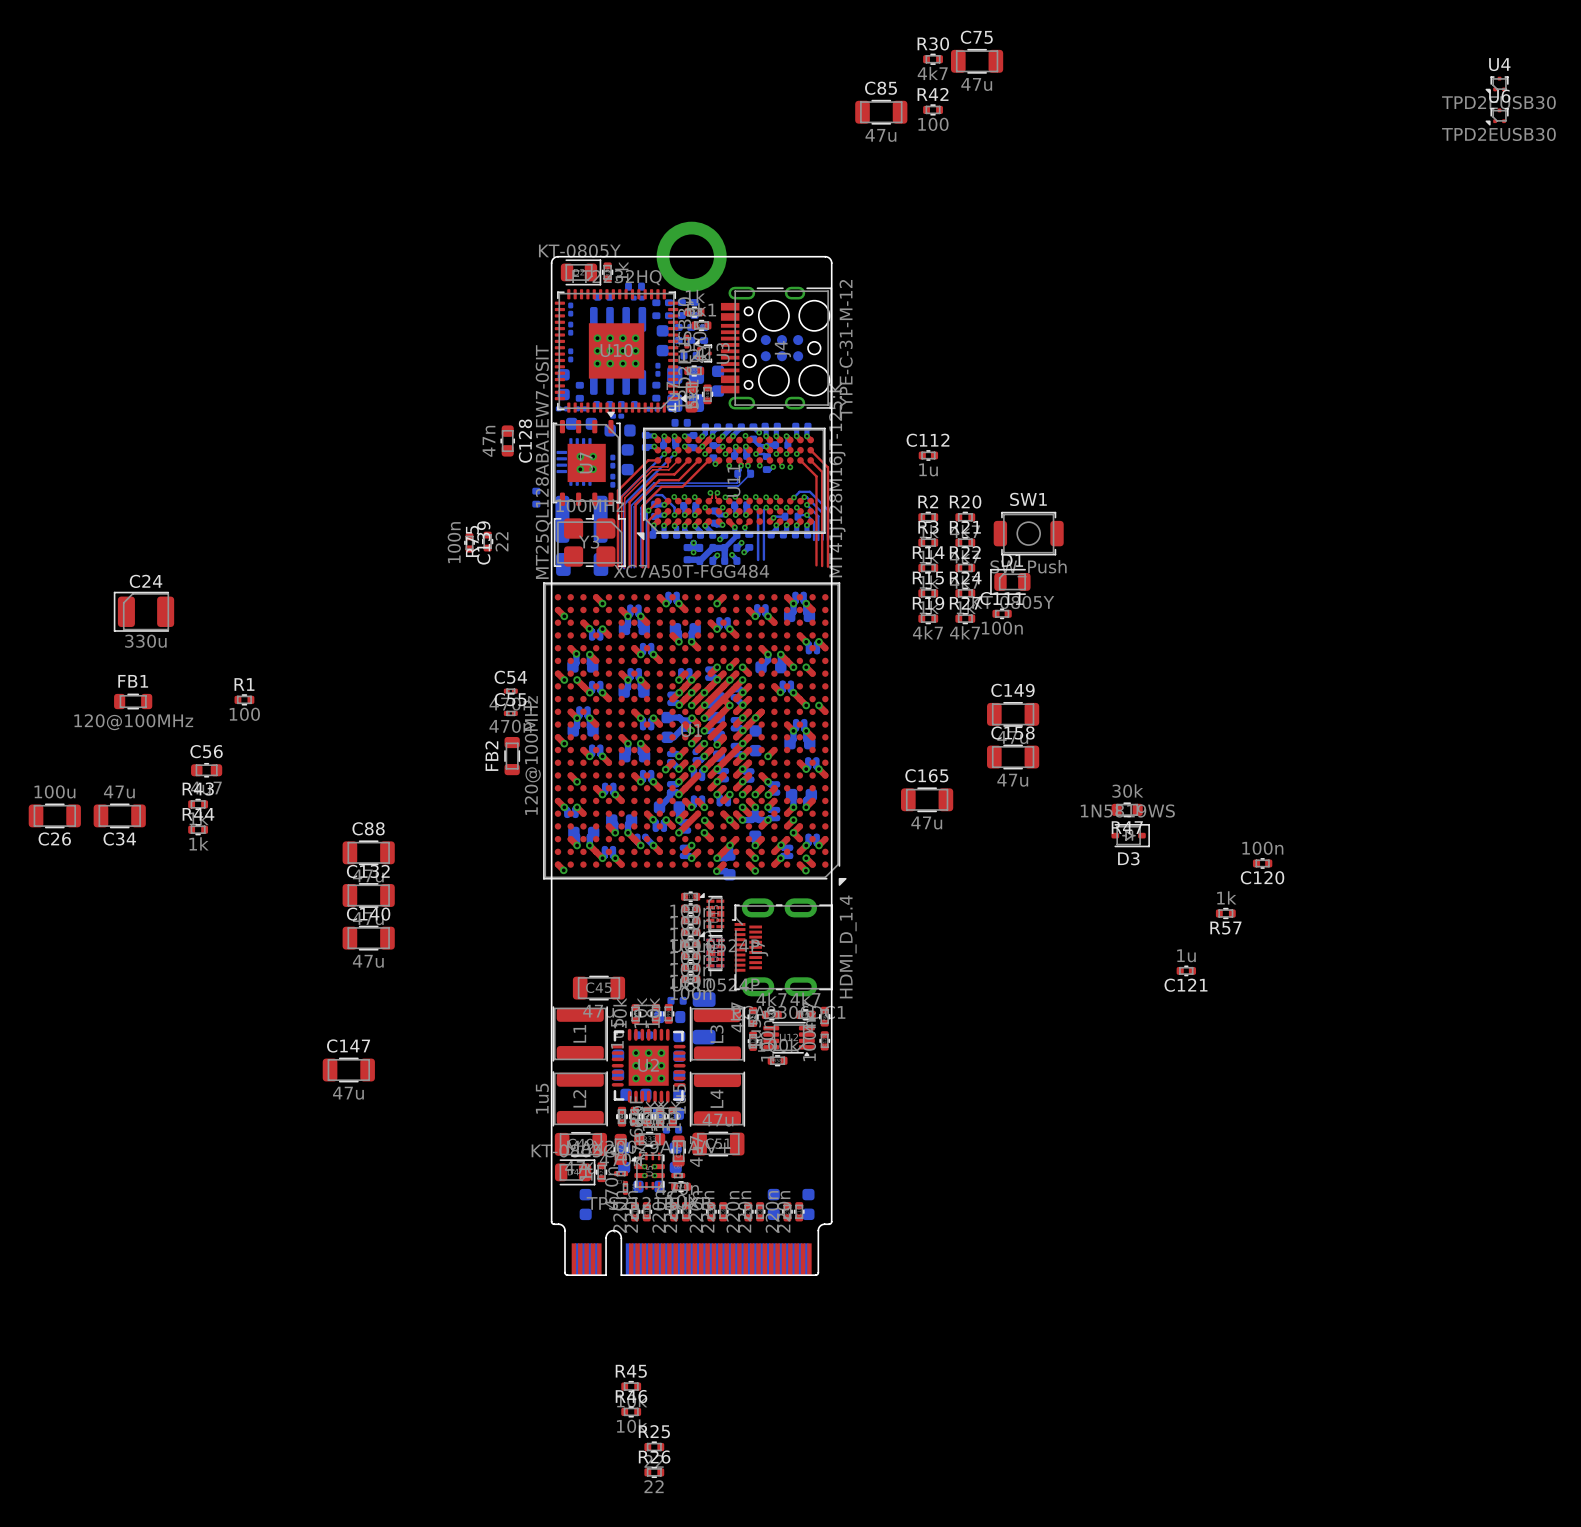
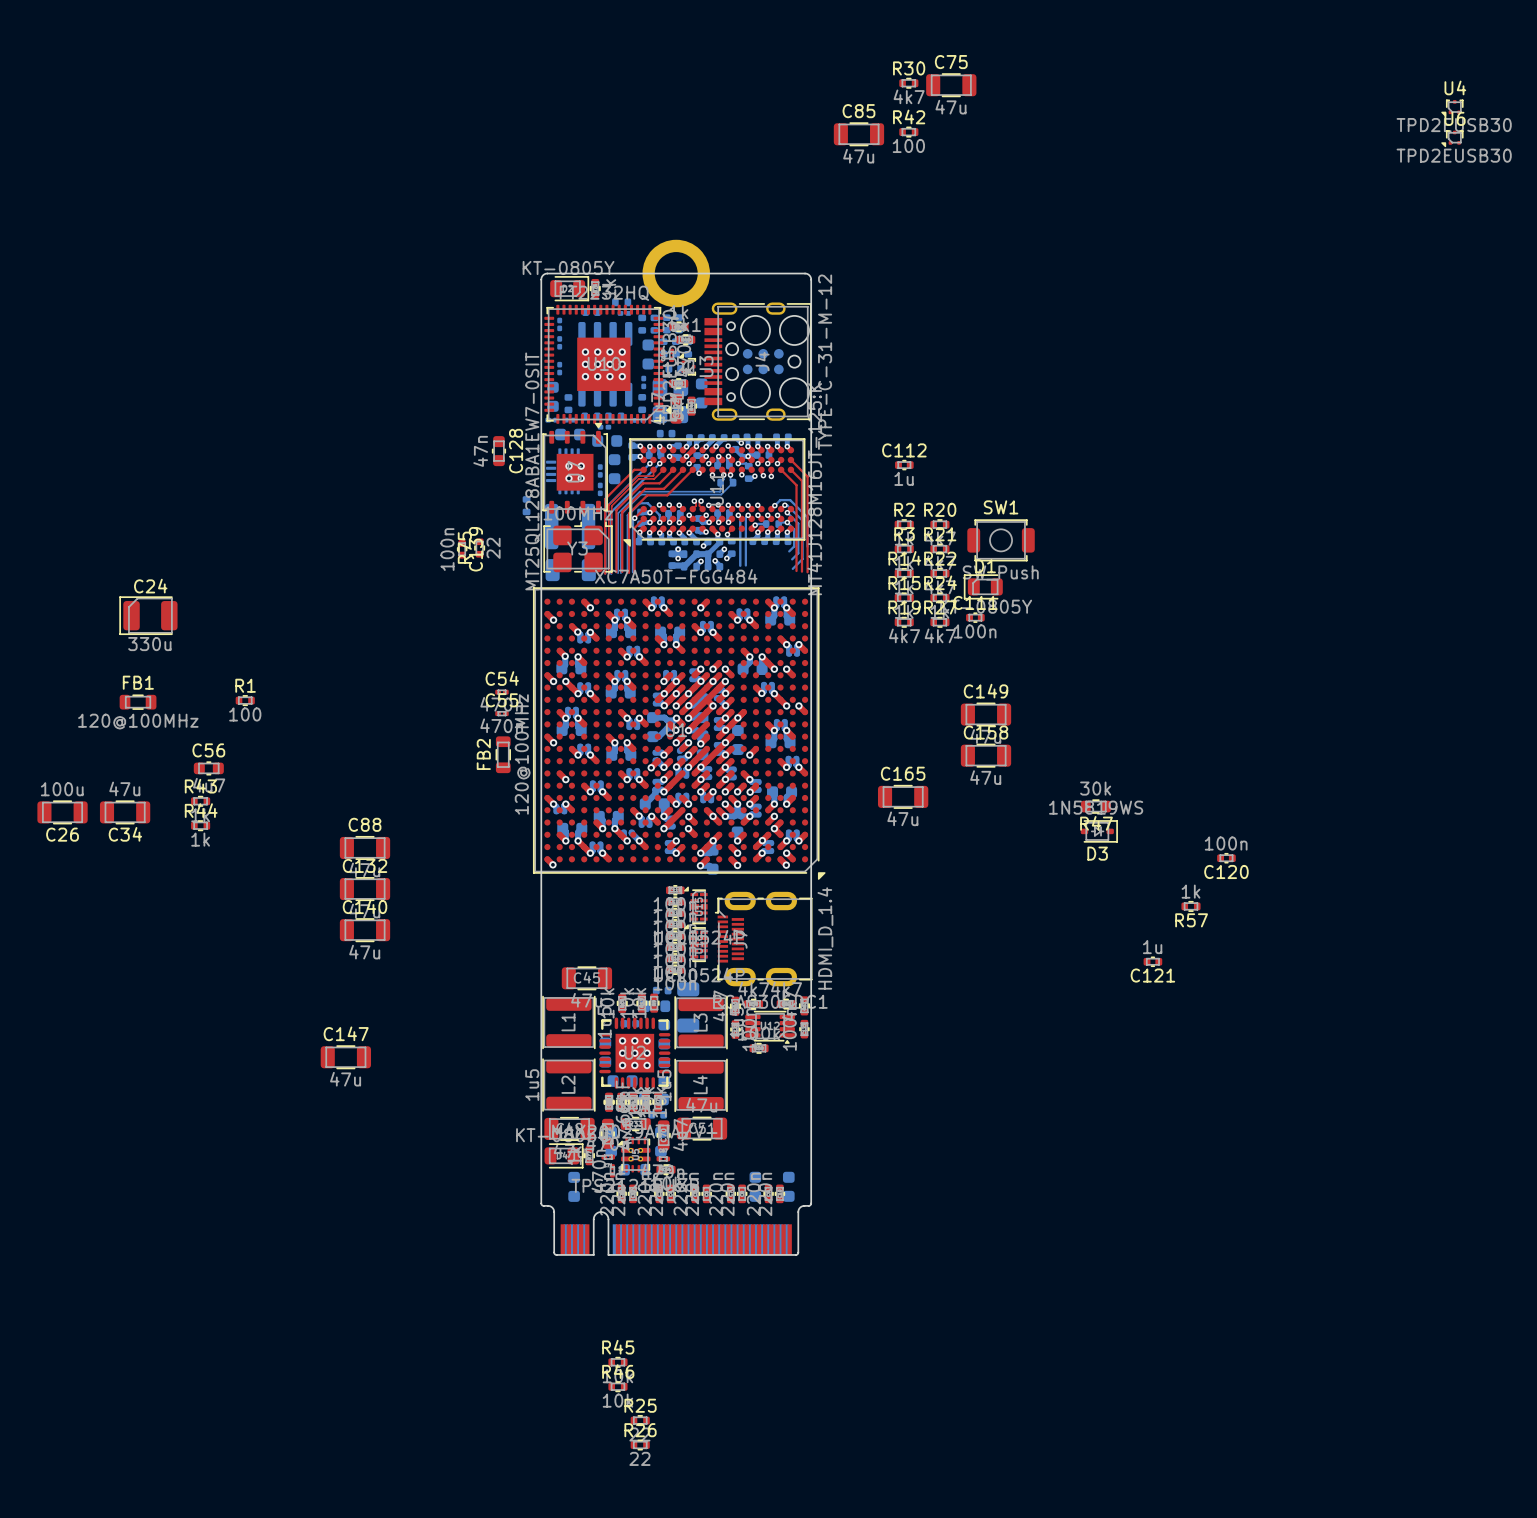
bottom track: none -> (794, 546) (789, 551)
bottom track: none -> (798, 546) (798, 553) (792, 559)
bottom track: none -> (802, 546) (802, 559) (792, 568)

